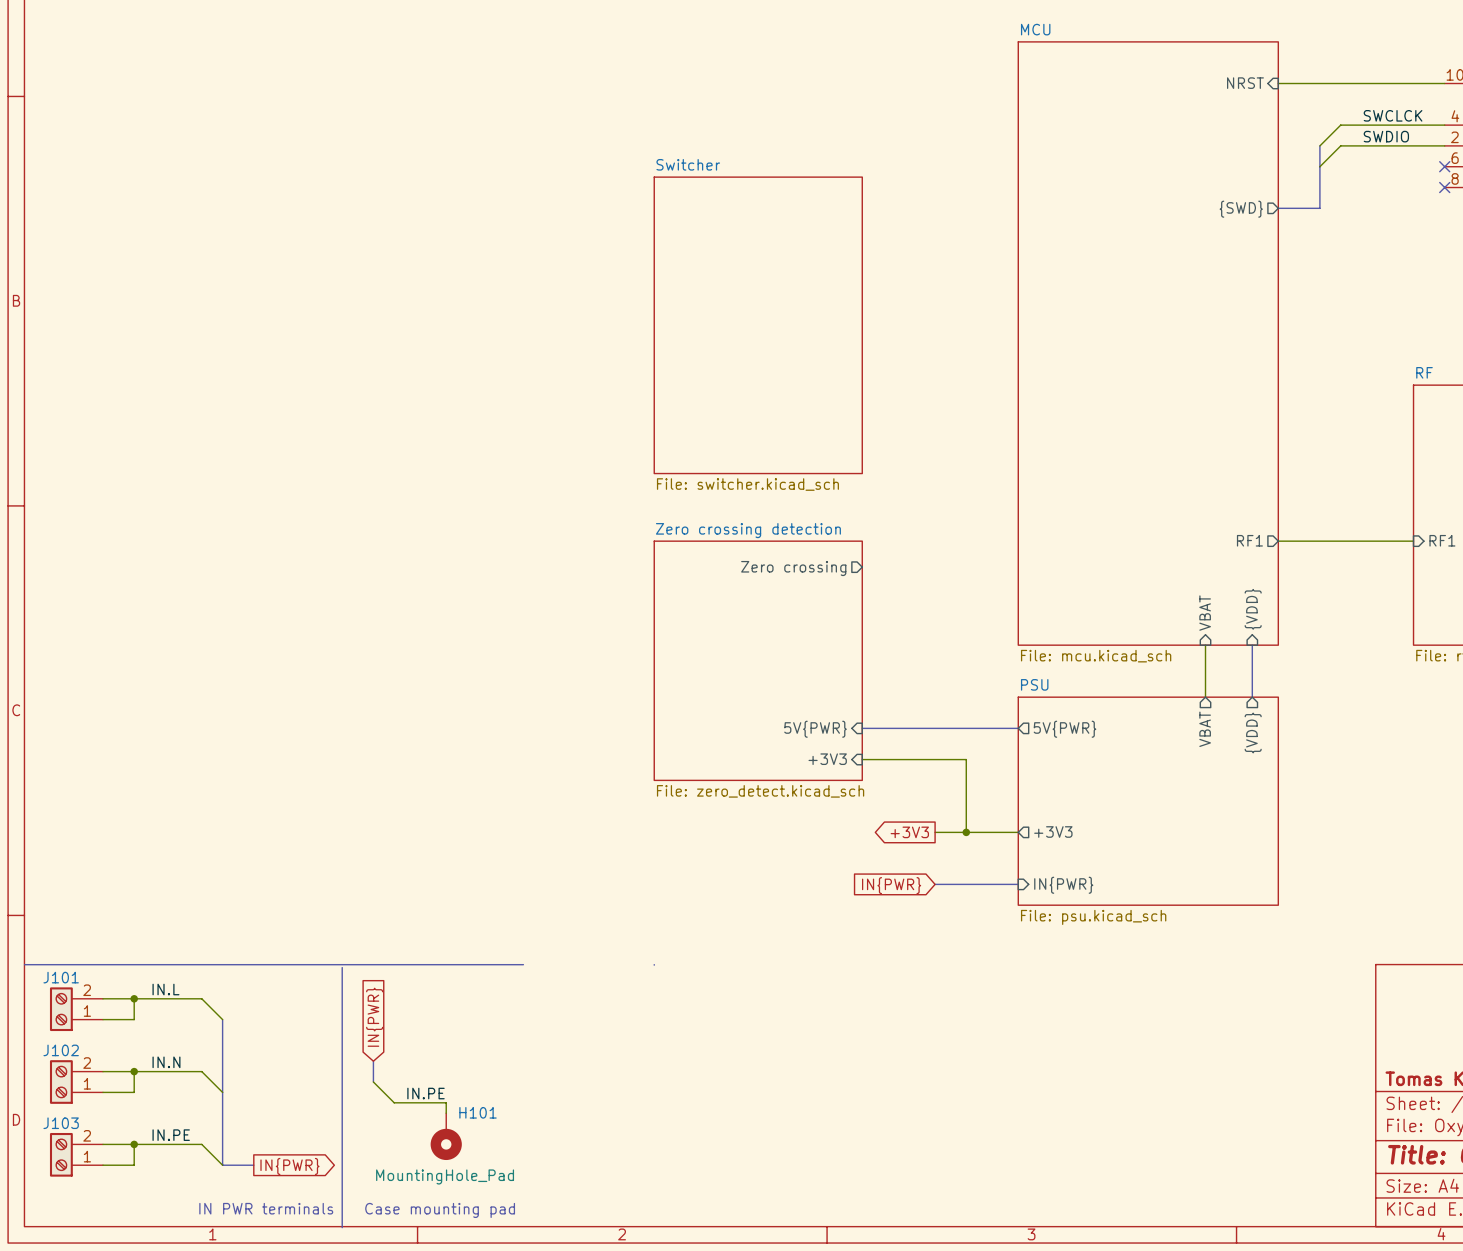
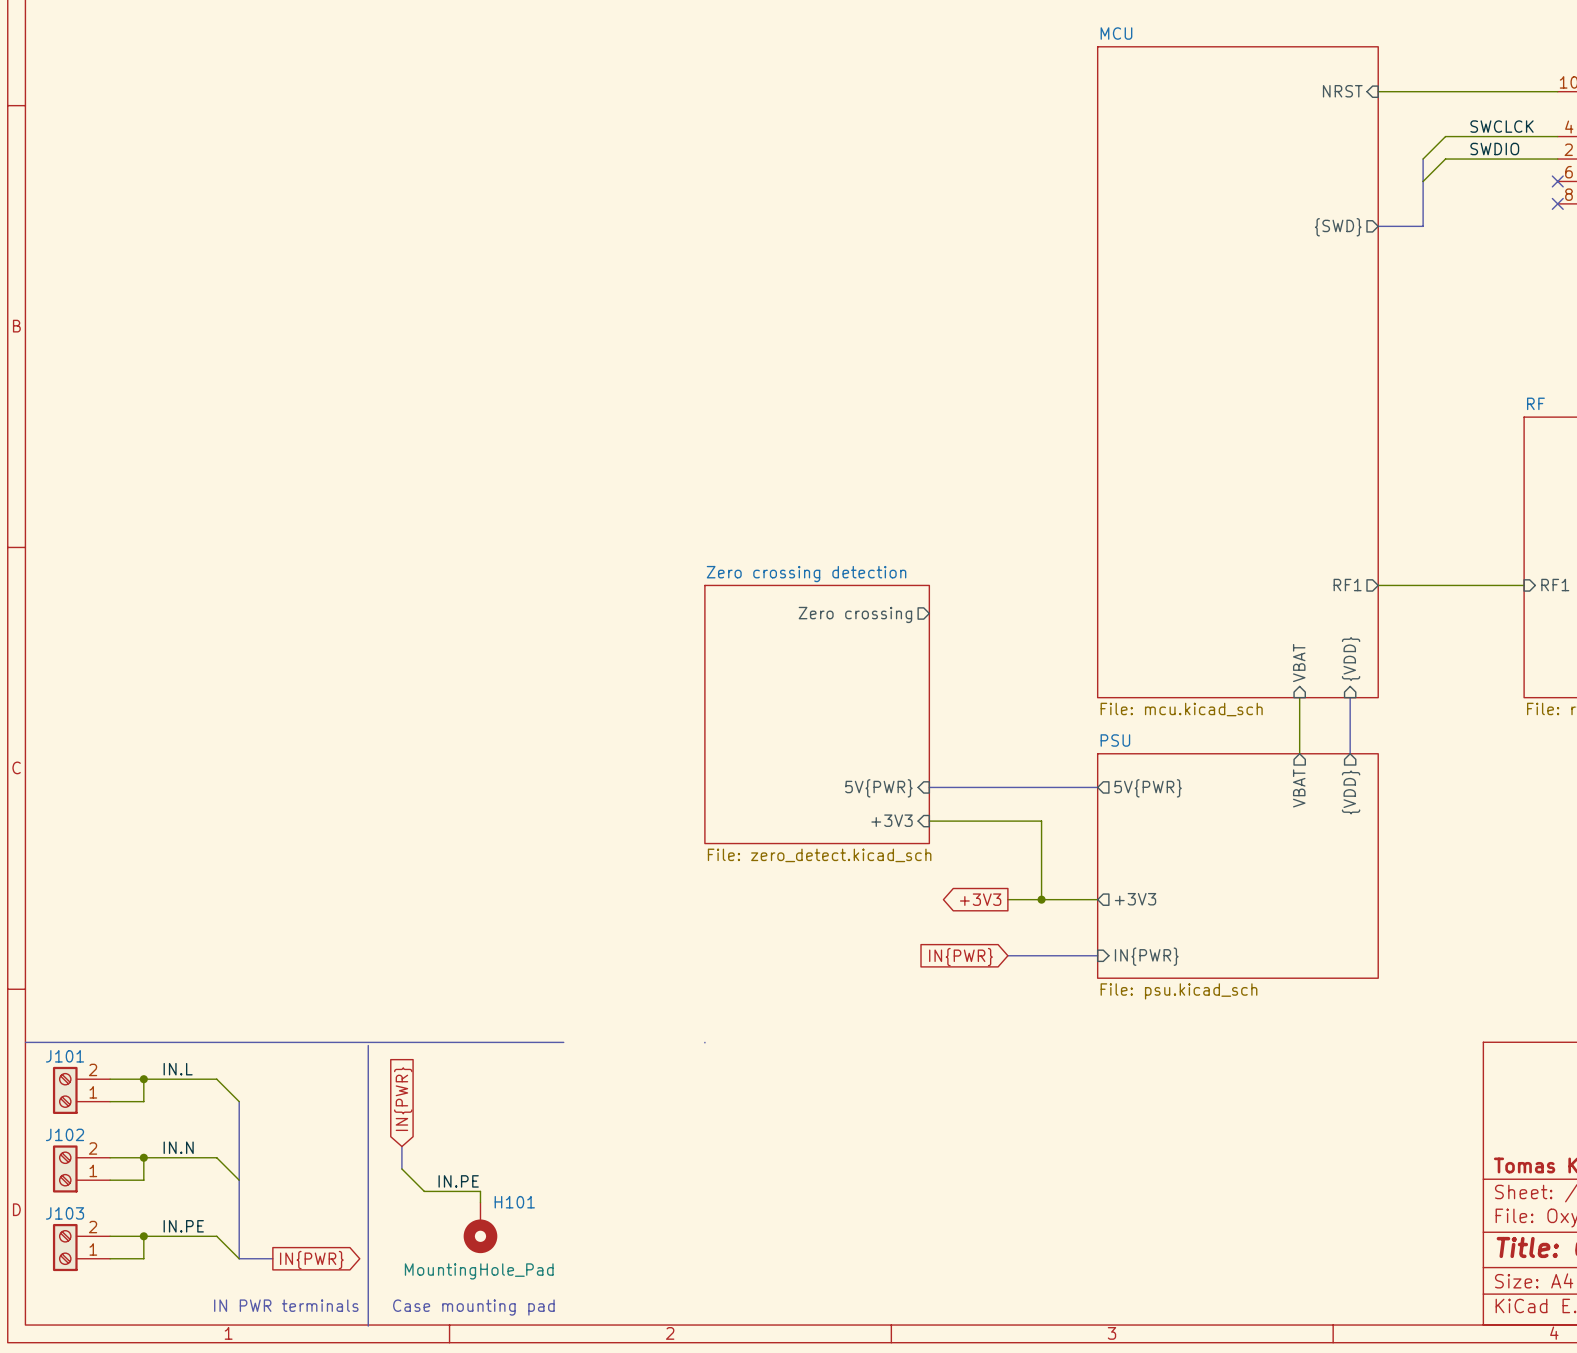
sheet Switcher: File: switcher.kicad_sch (758, 325) -> none

